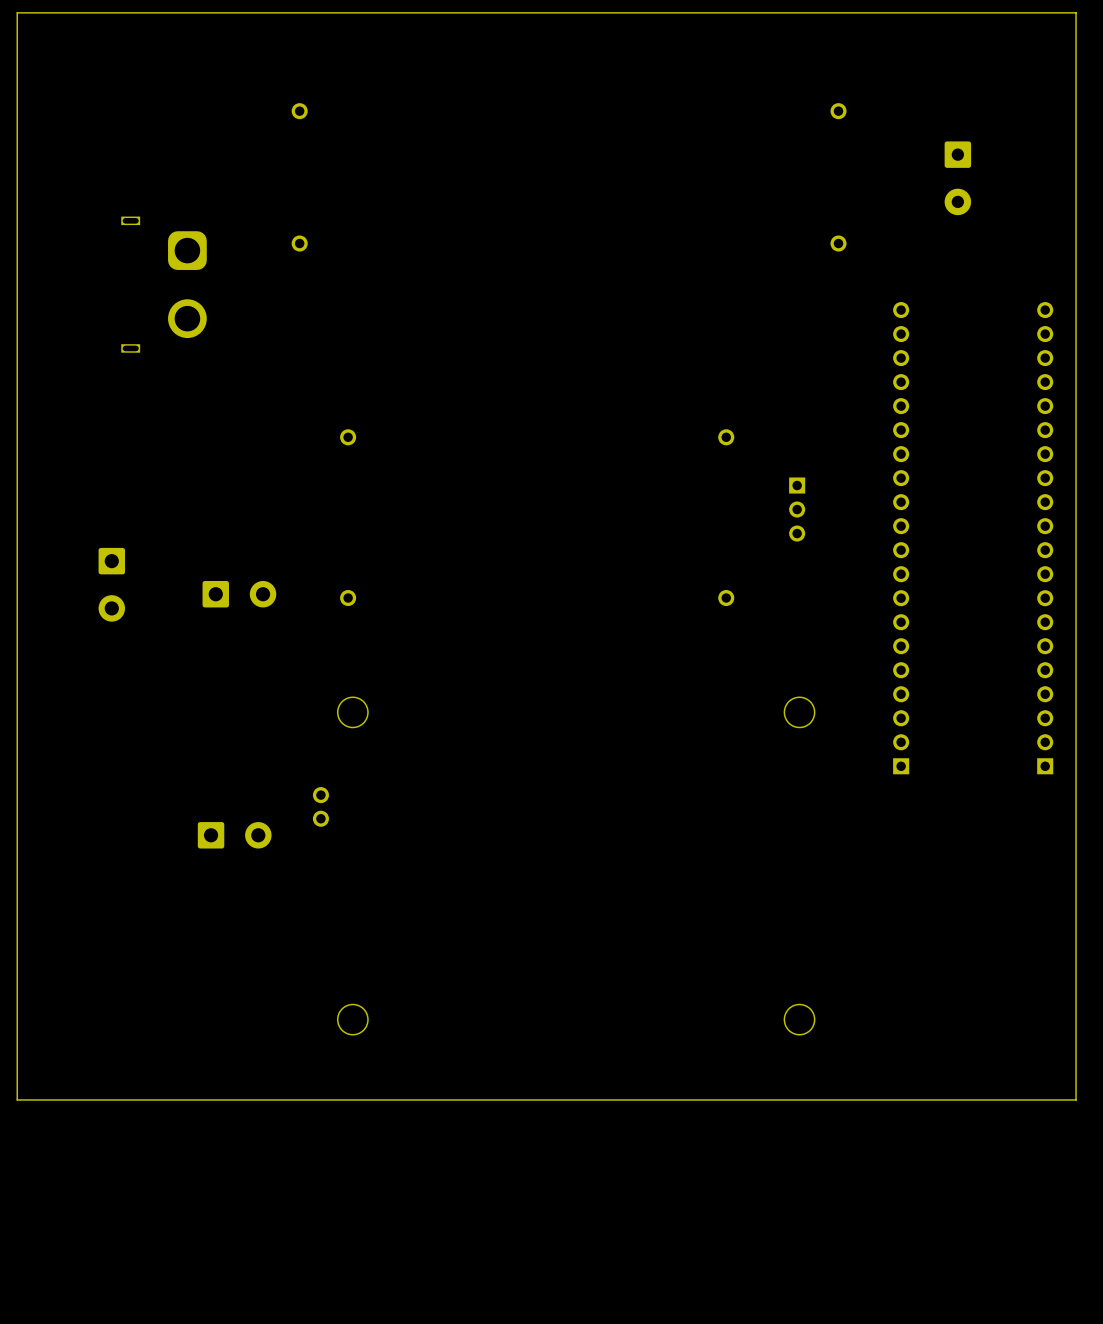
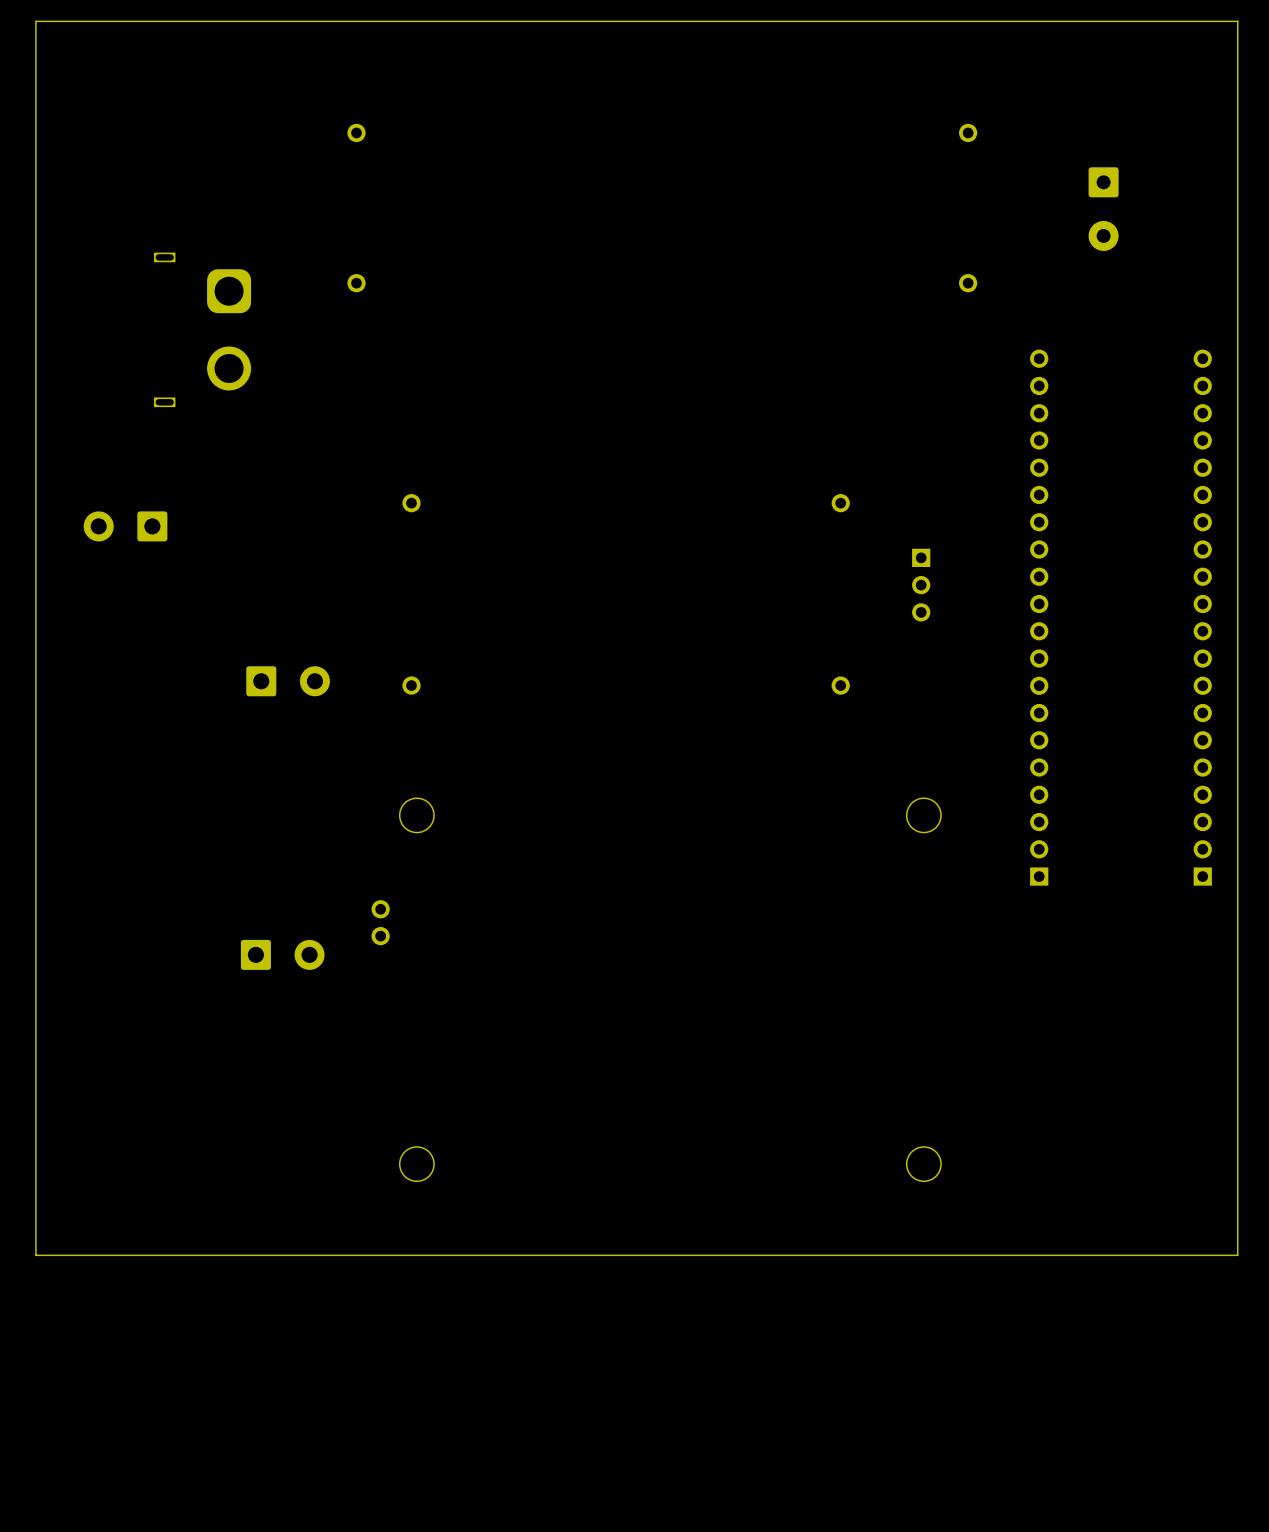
part rotation: 0° (111, 584) -> 90° clockwise (125, 526)
part position: (111, 584) -> (125, 526)

